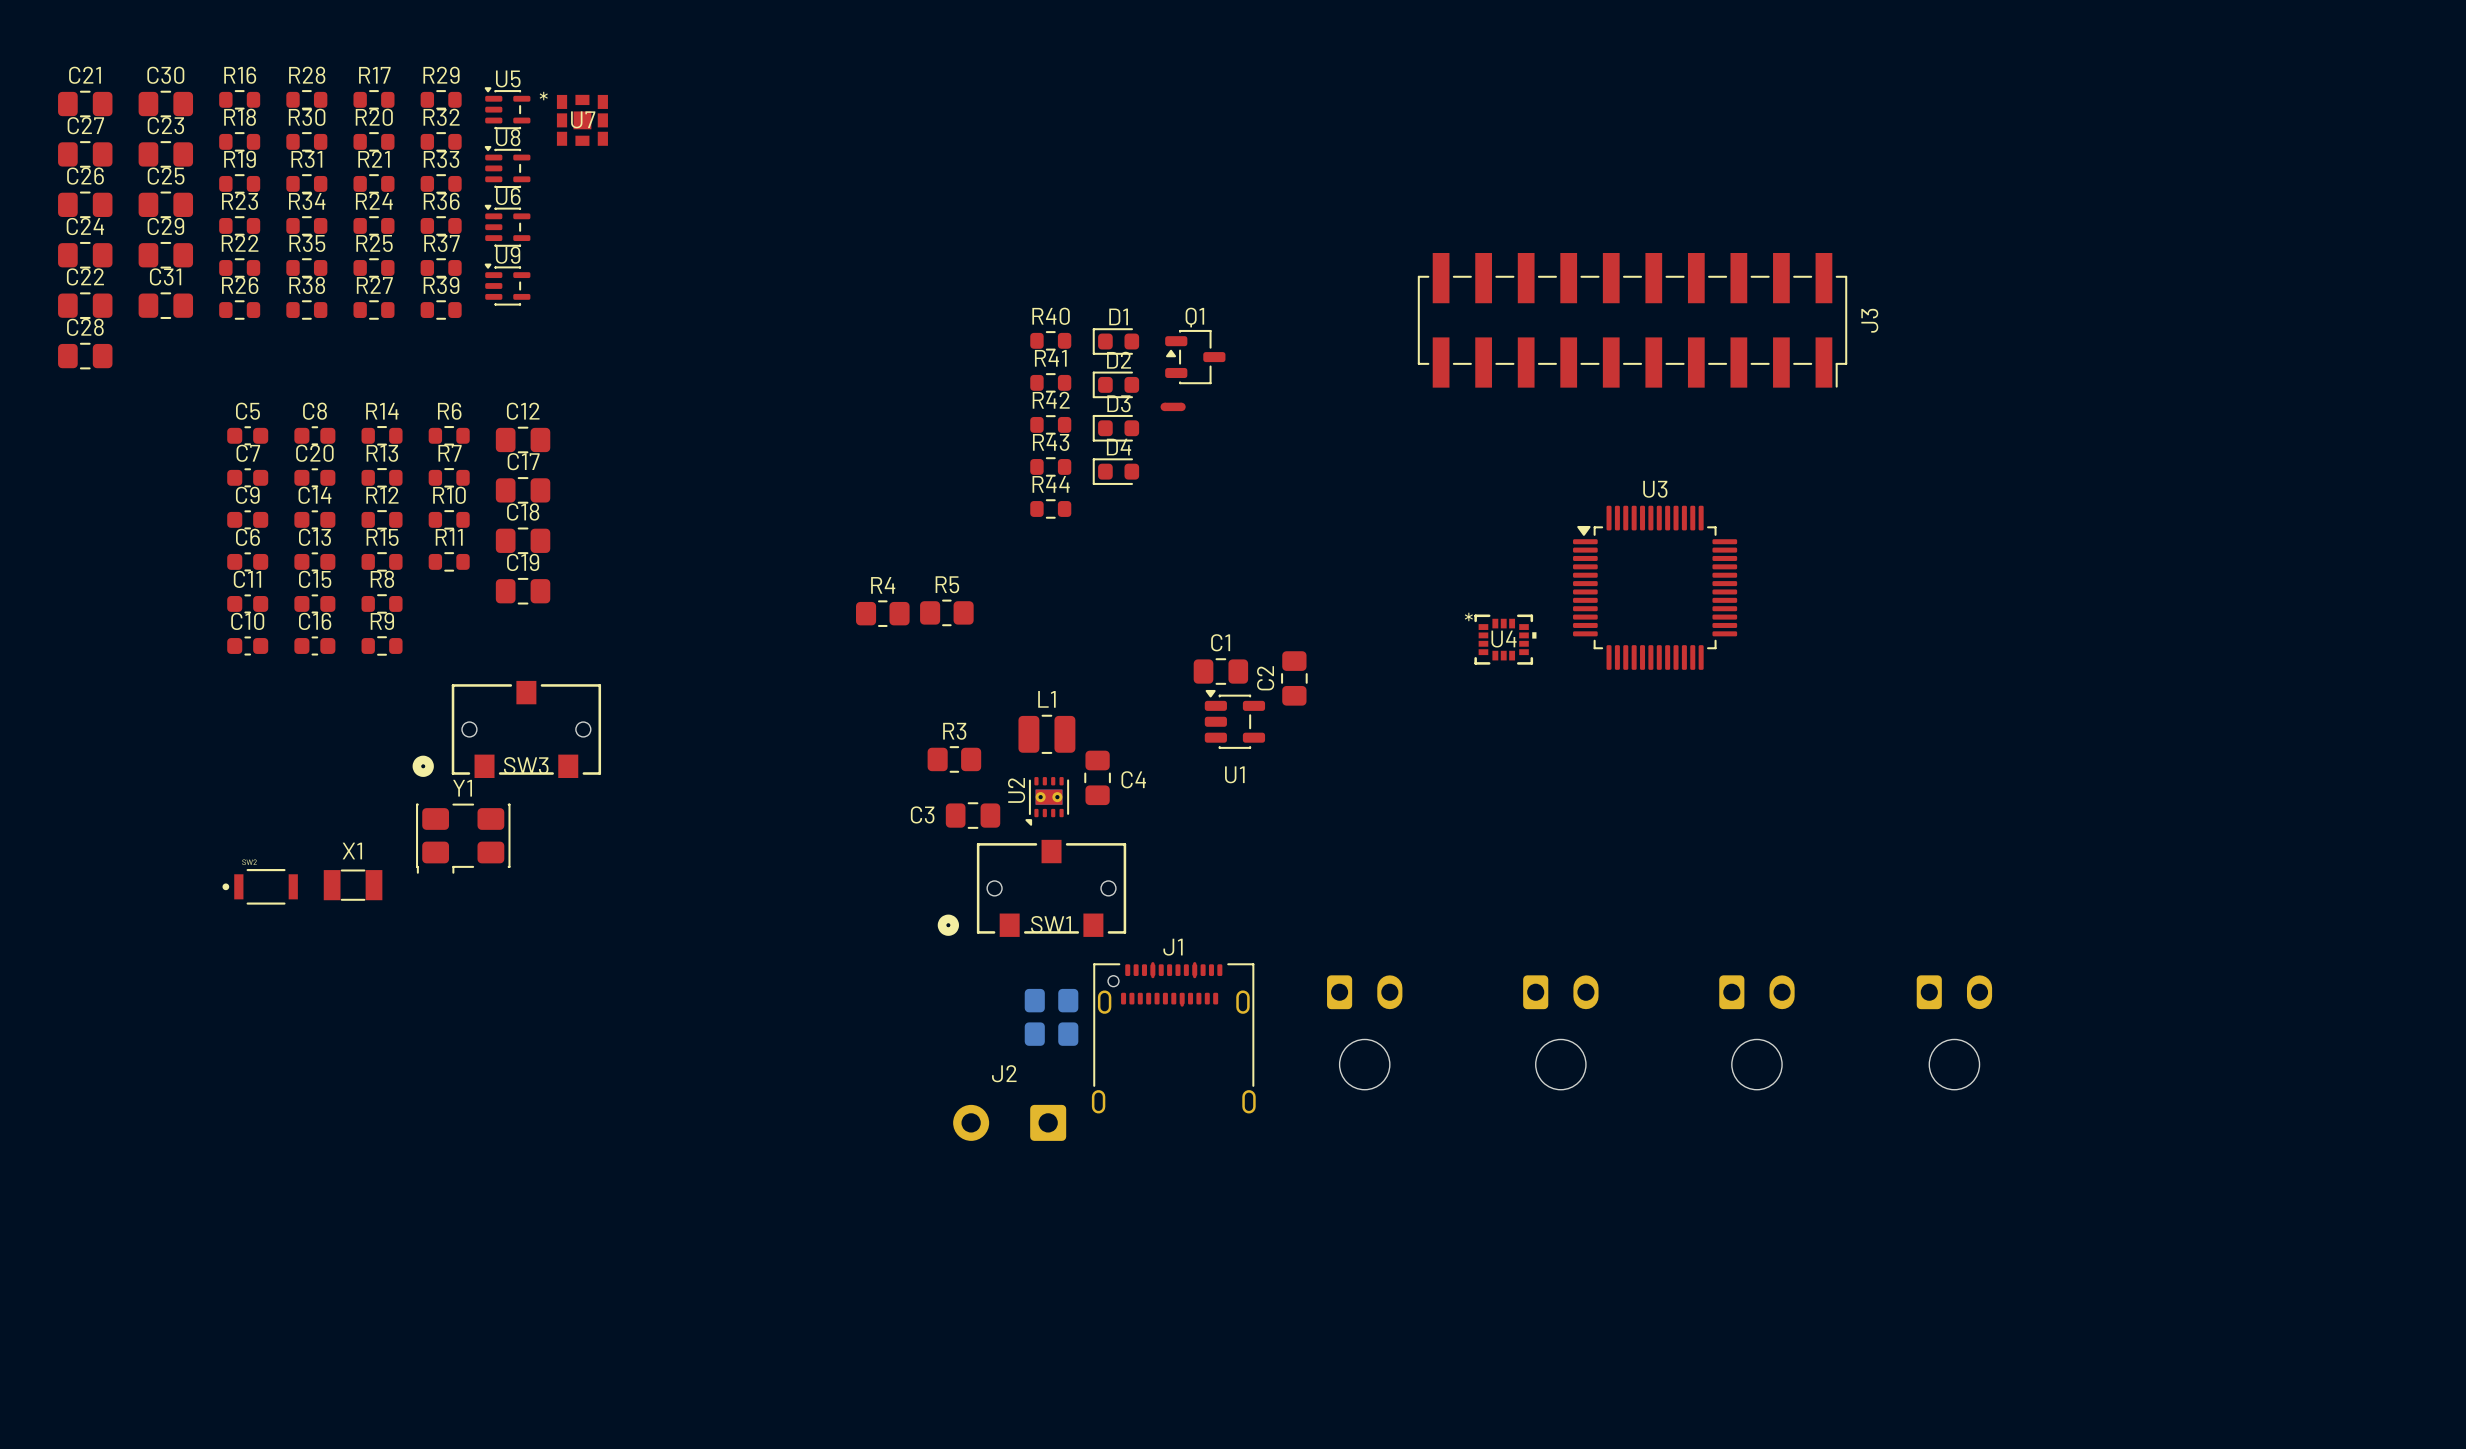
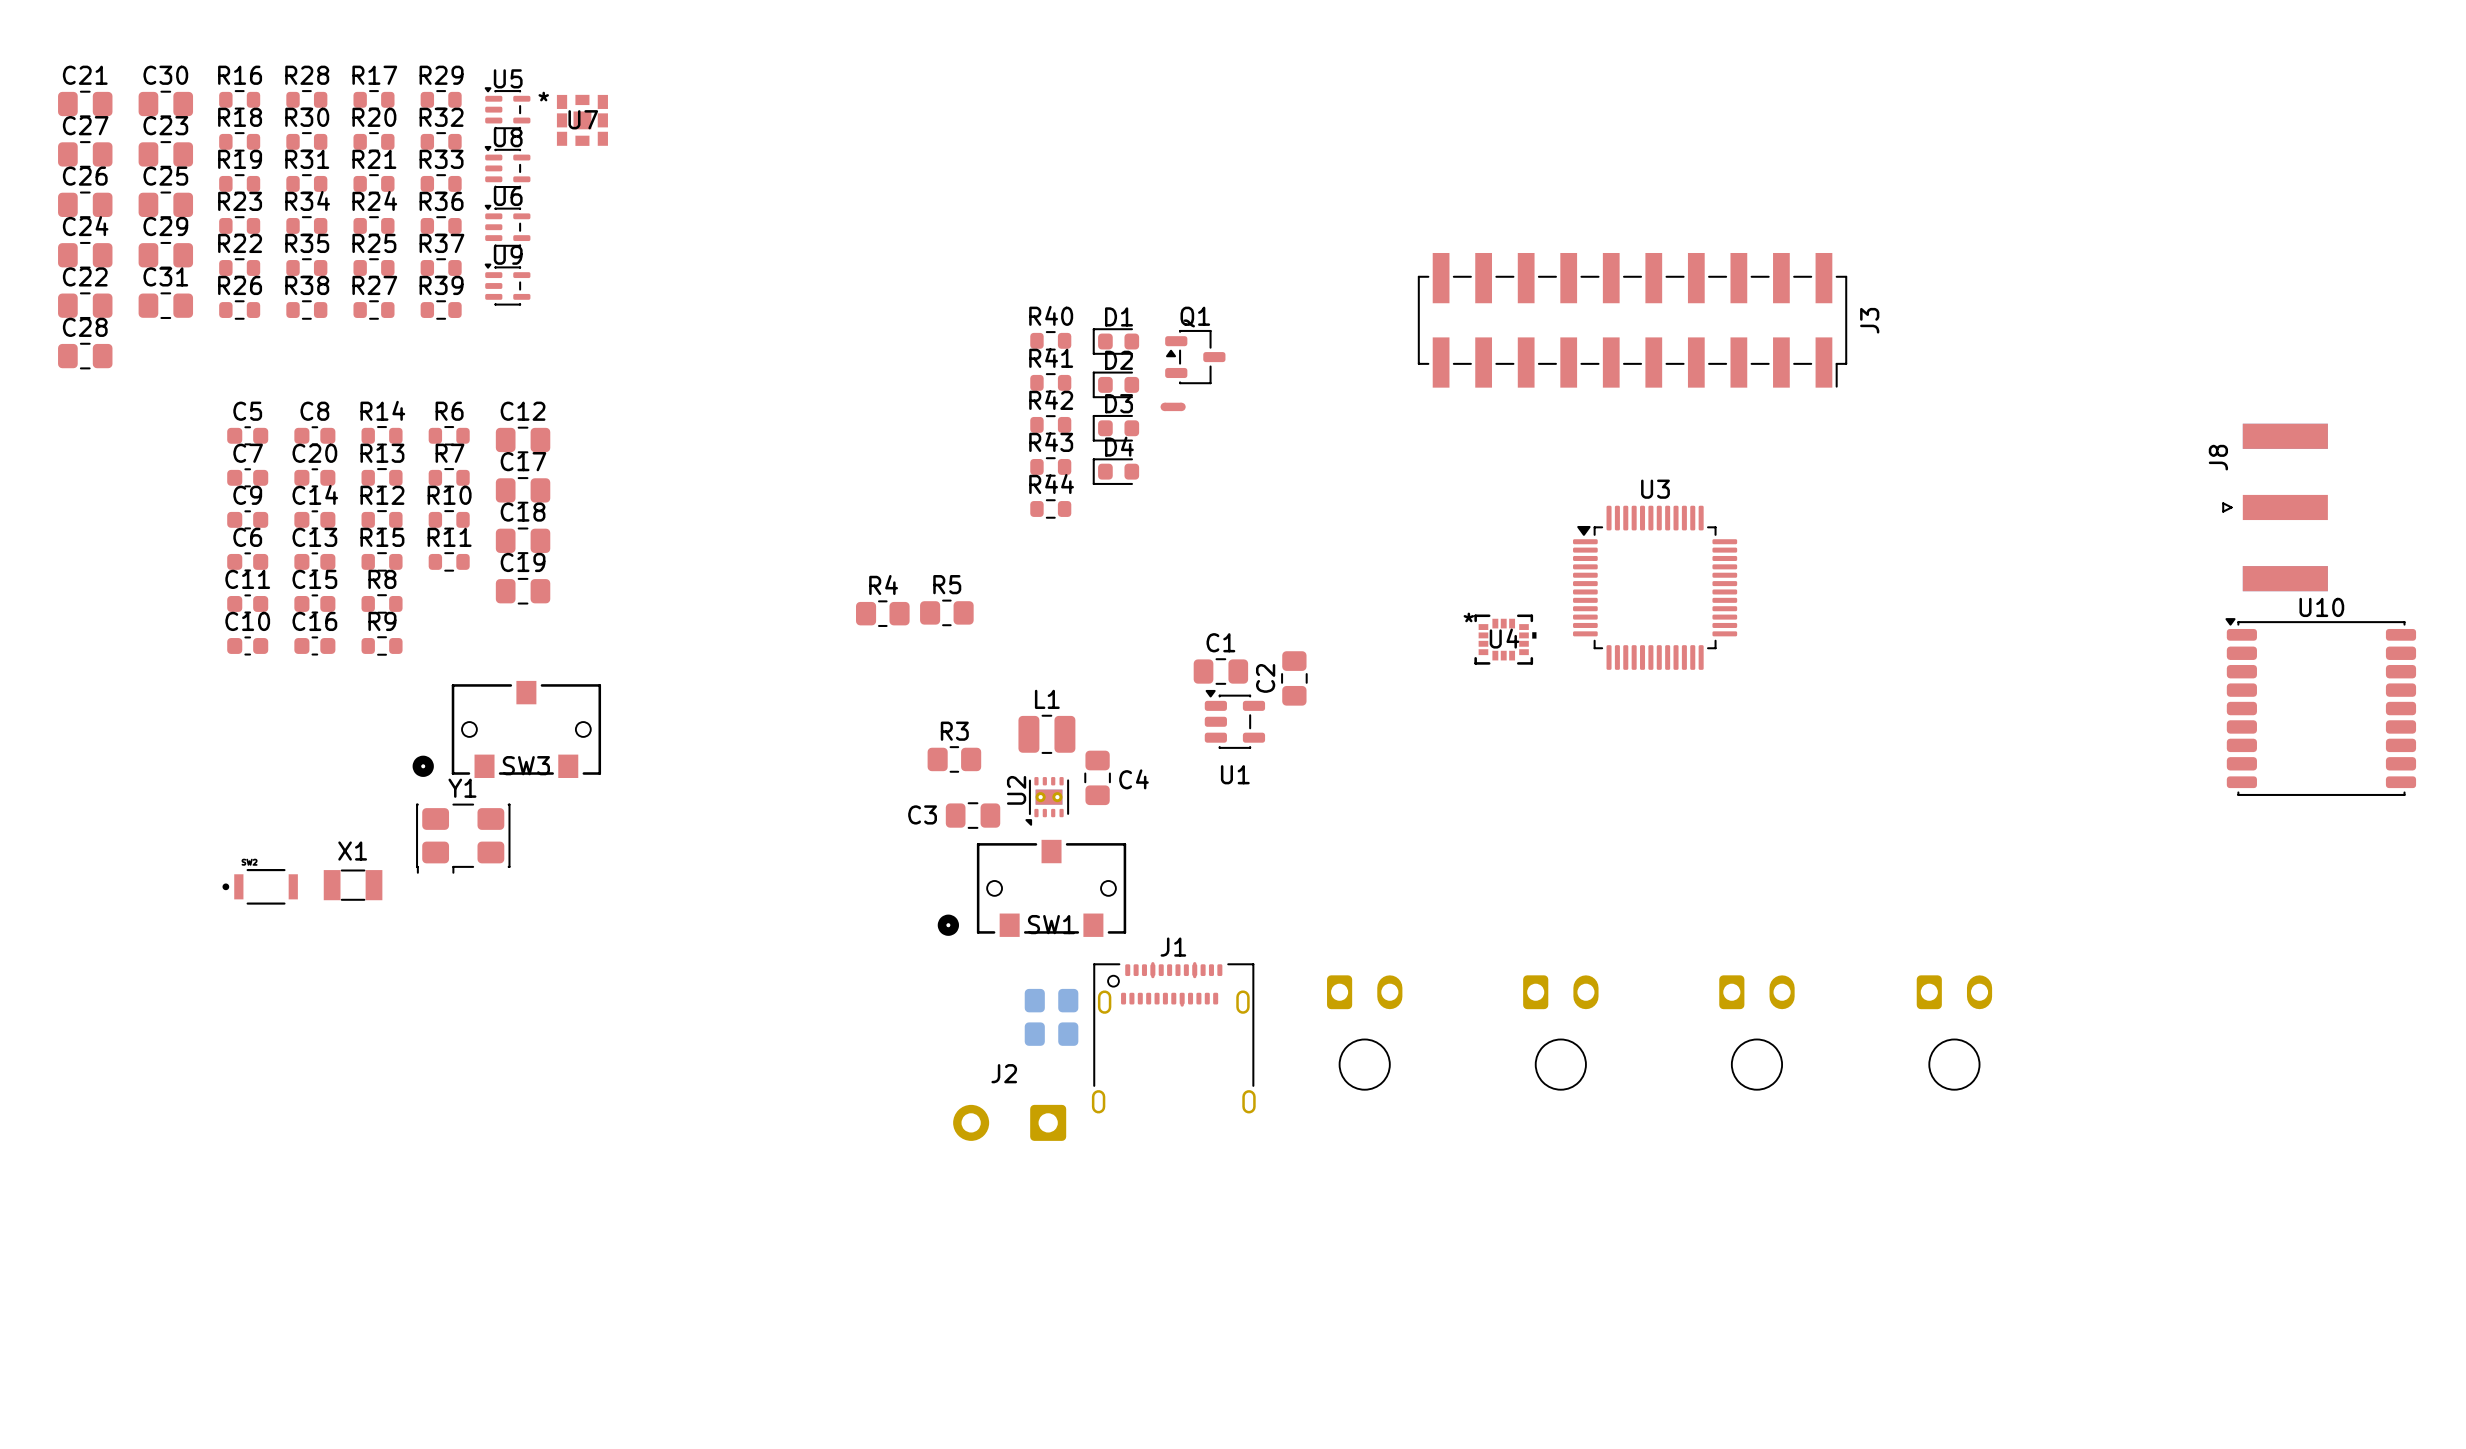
J8: none -> (2275, 507)
U10: none -> (2320, 707)

